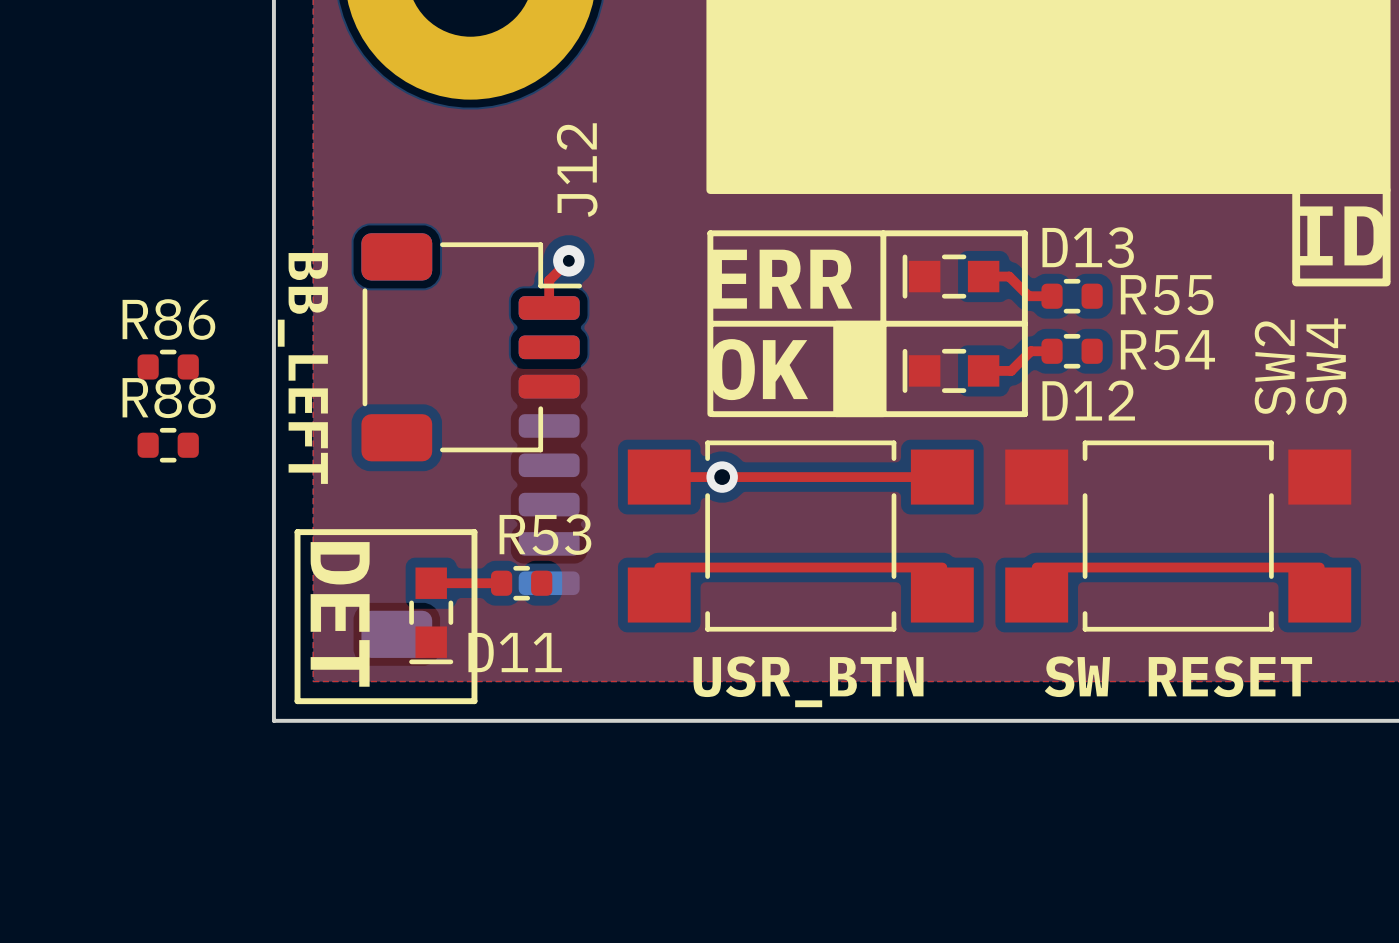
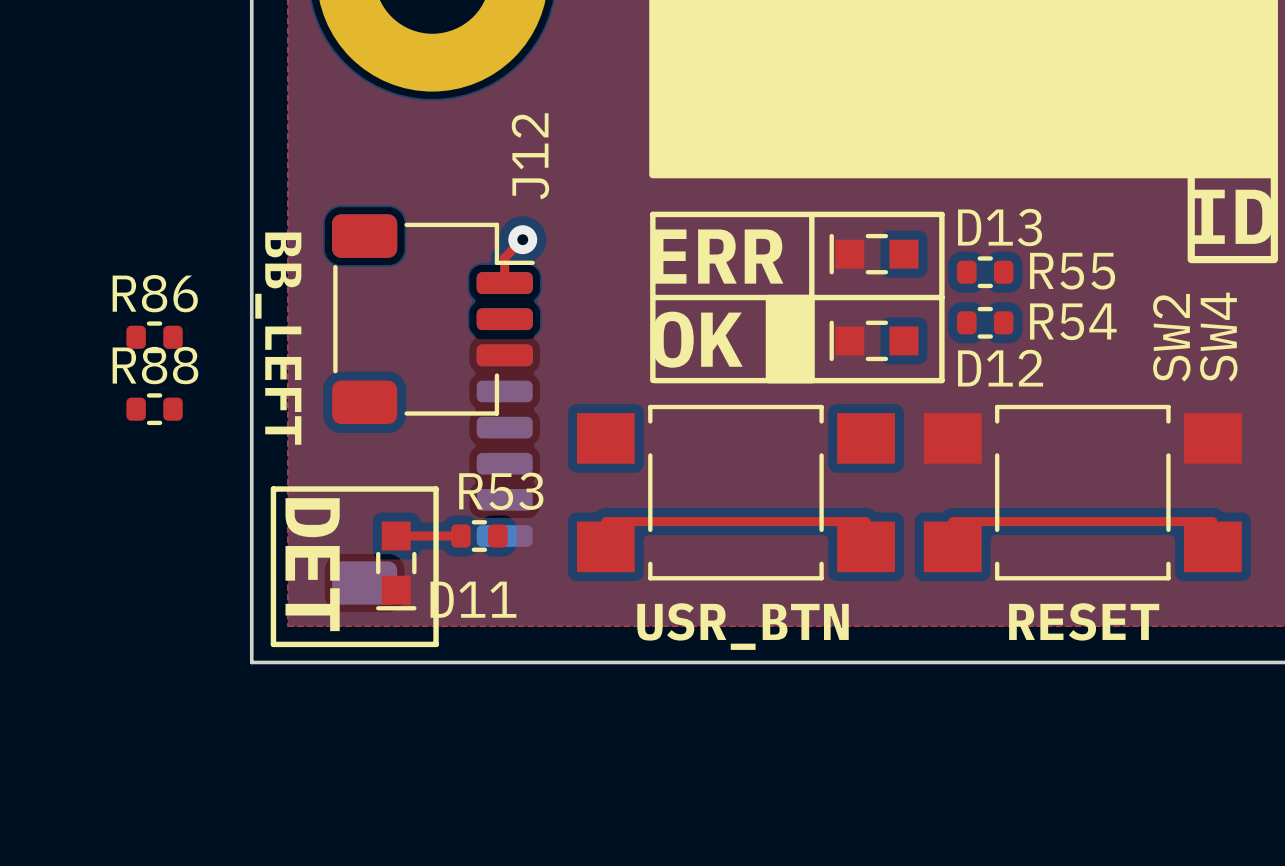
top track: (983, 276) (1009, 276) (1028, 296) (1052, 296) -> none
top track: (1052, 351) (1030, 351) (1011, 370) (983, 370) -> none
top track: (659, 477) (942, 477) -> none
via: (722, 477) -> none
text: SW RESET (1178, 676) -> RESET (1084, 621)

